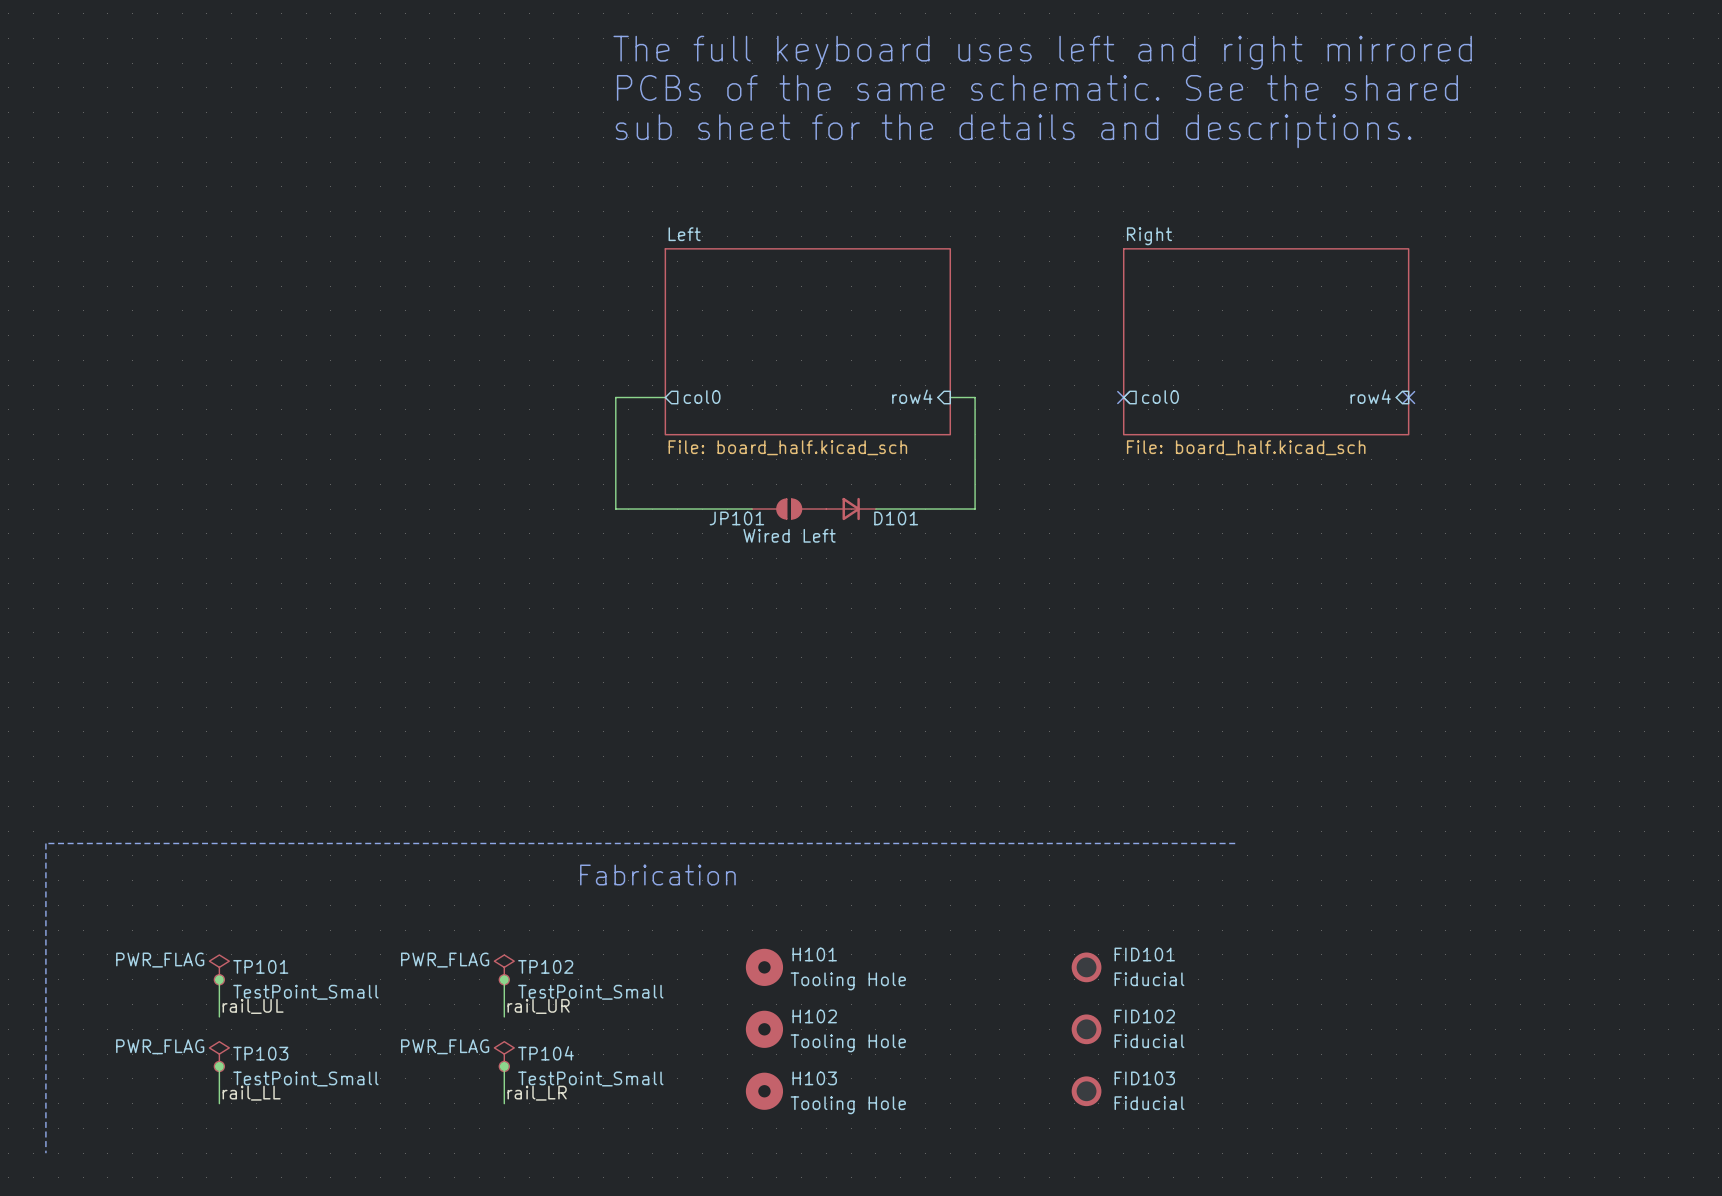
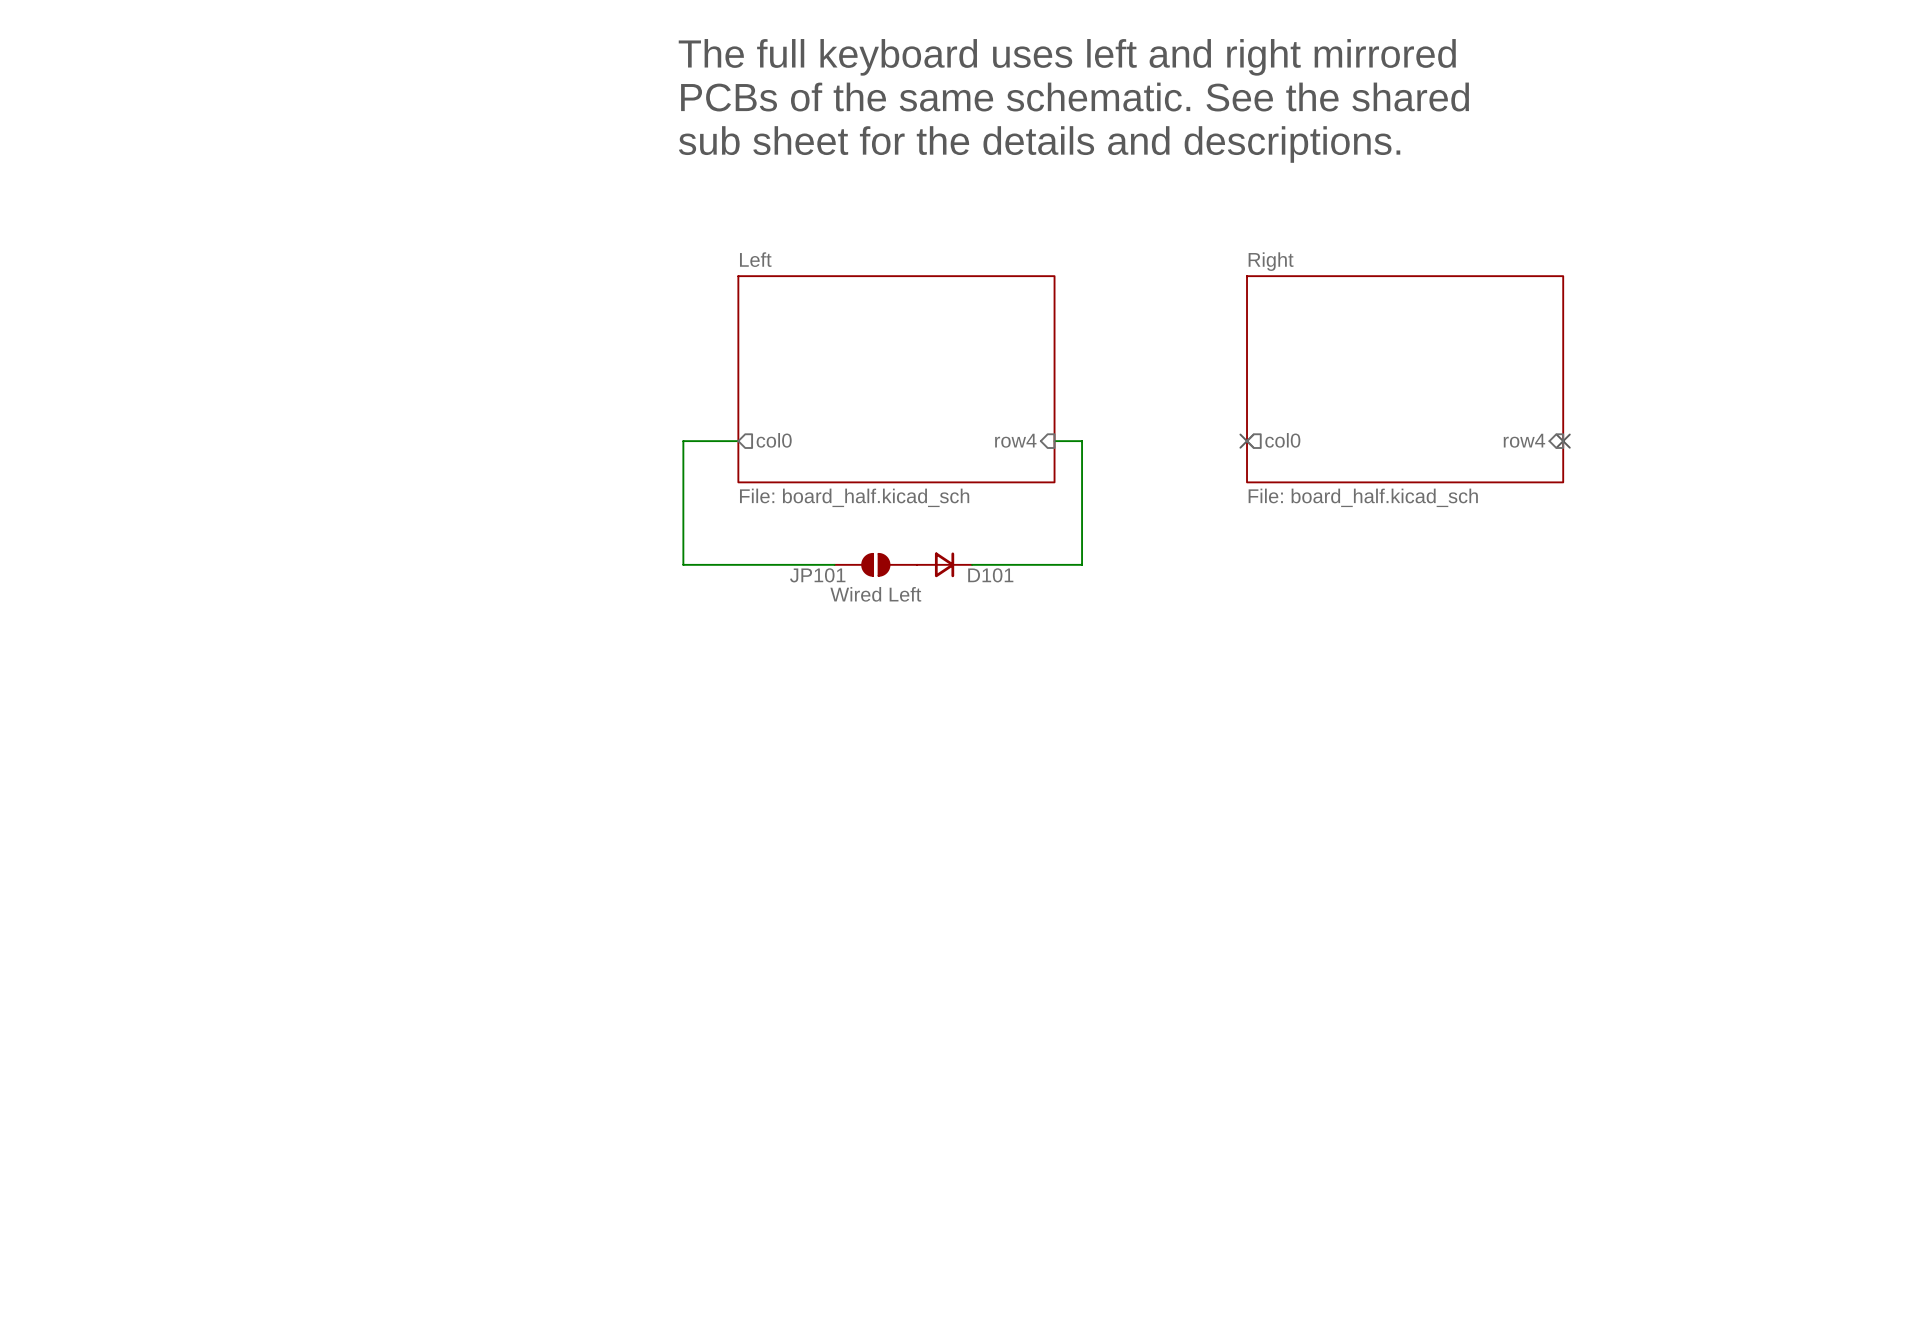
line: (1235, 843) (45, 843) (45, 1153) -> none
text: Fabrication (657, 875) -> none
power symbol: PWR_FLAG (219, 967) -> none
power symbol: PWR_FLAG (504, 967) -> none
H101: Tooling Hole (764, 967) -> none
FID101: Fiducial (1086, 967) -> none
wire: (219, 979) (219, 1016) -> none
junction: (219, 979) -> none
TP101: TestPoint_Small (219, 979) -> none
wire: (504, 979) (504, 1016) -> none
junction: (504, 979) -> none
TP102: TestPoint_Small (504, 979) -> none
label: rail_UL (253, 1006) -> none
label: rail_UR (538, 1006) -> none
H102: Tooling Hole (764, 1029) -> none
FID102: Fiducial (1086, 1029) -> none
power symbol: PWR_FLAG (219, 1054) -> none
power symbol: PWR_FLAG (504, 1054) -> none
wire: (219, 1066) (219, 1103) -> none
junction: (219, 1066) -> none
TP103: TestPoint_Small (219, 1066) -> none
wire: (504, 1066) (504, 1103) -> none
junction: (504, 1066) -> none
TP104: TestPoint_Small (504, 1066) -> none
H103: Tooling Hole (764, 1091) -> none
FID103: Fiducial (1086, 1091) -> none
label: rail_LL (251, 1093) -> none
label: rail_LR (537, 1093) -> none

